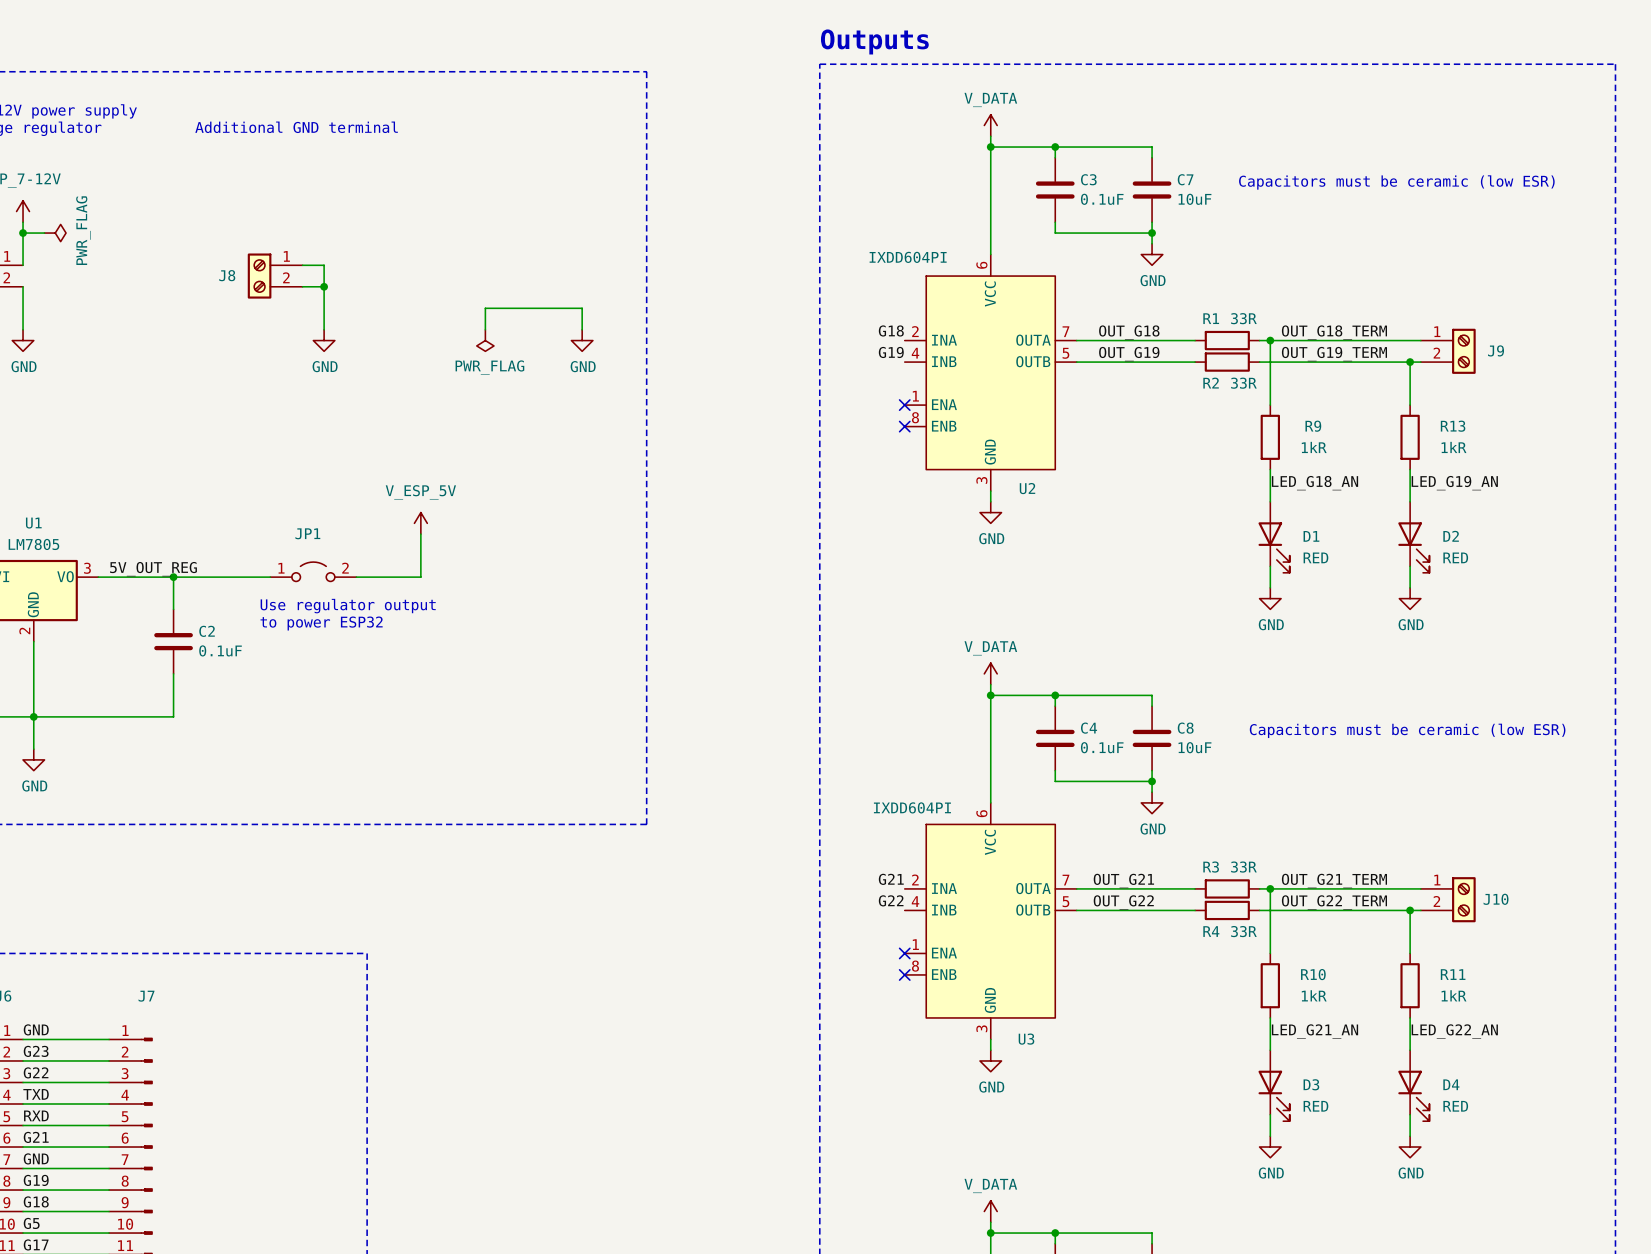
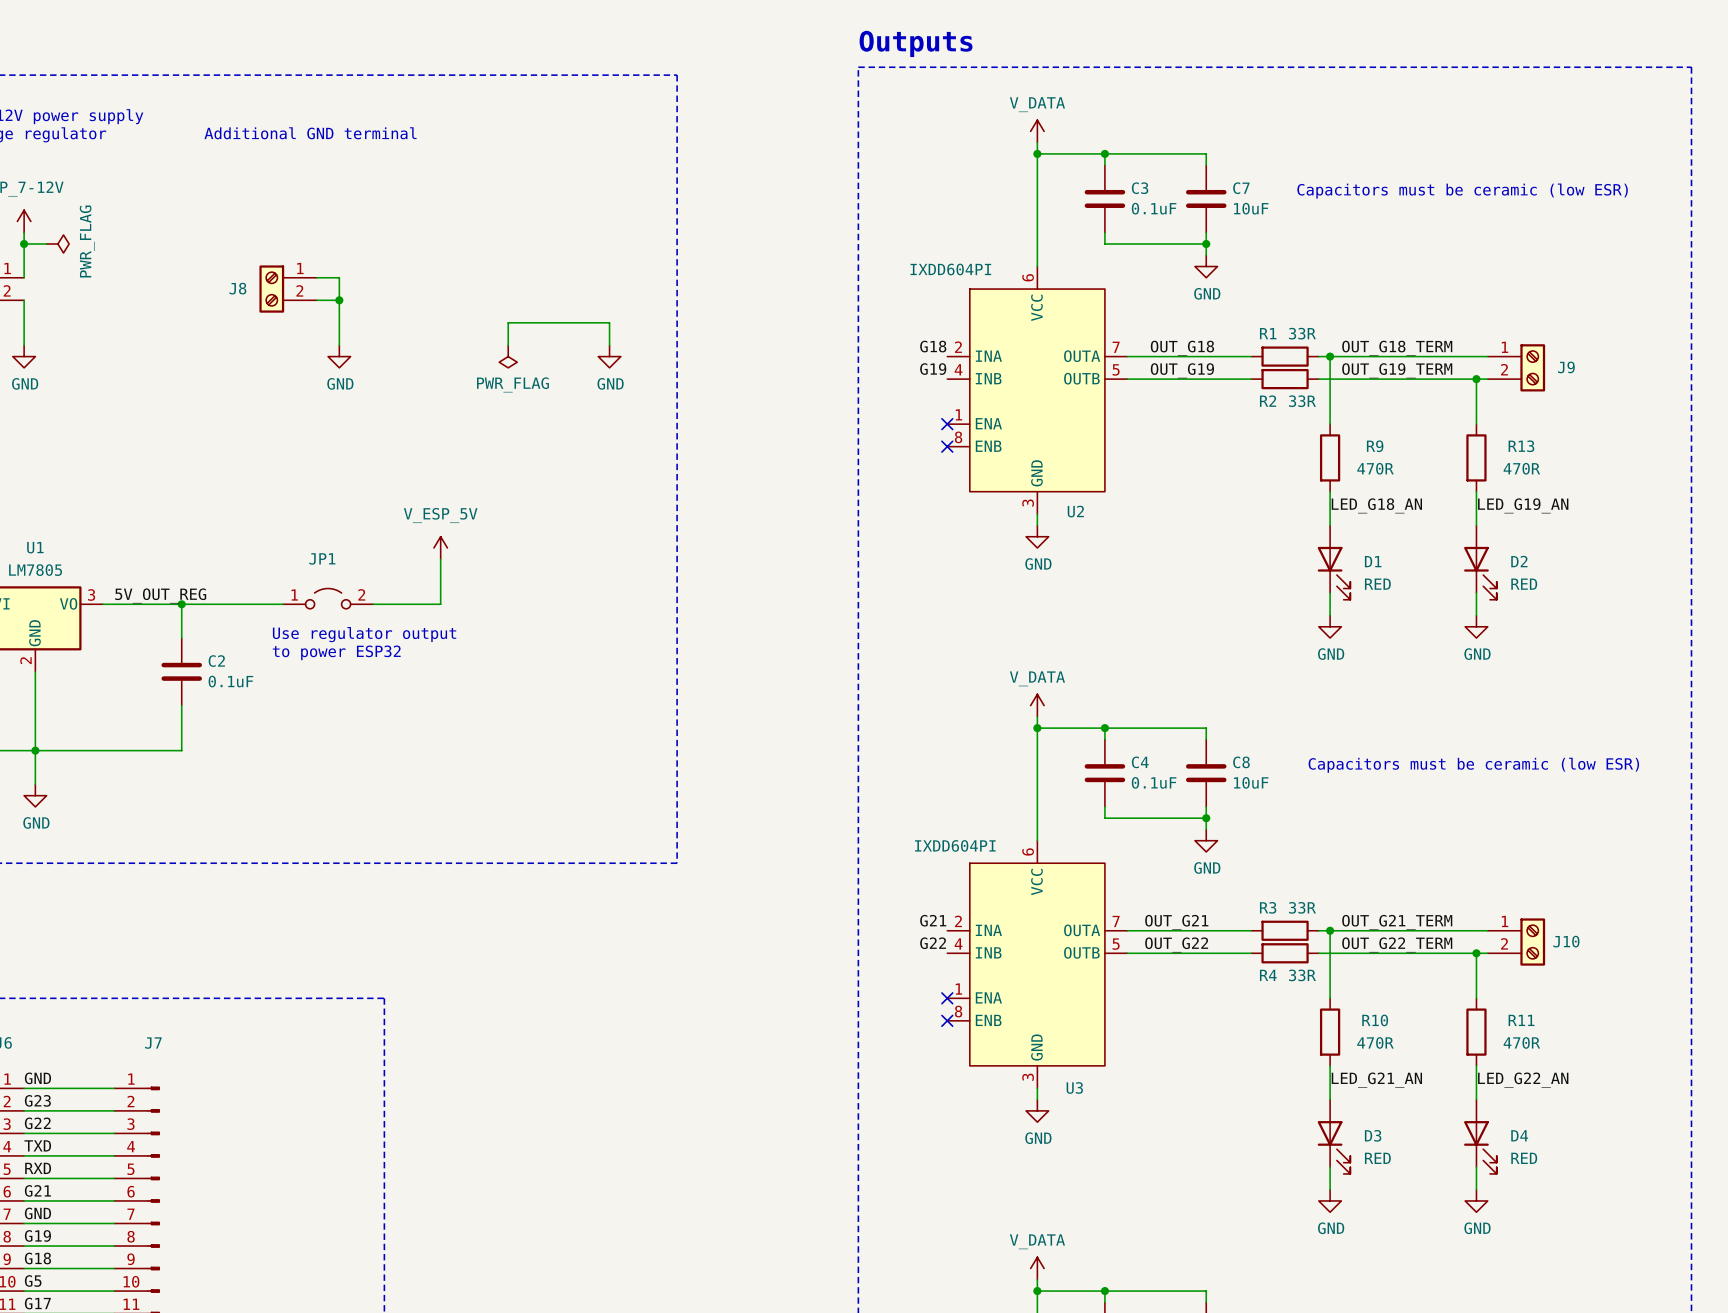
R9 value: 1kR (1314, 447) -> 470R (1375, 468)
R13 value: 1kR (1454, 447) -> 470R (1521, 468)
R10 value: 1kR (1314, 995) -> 470R (1375, 1042)
R11 value: 1kR (1454, 995) -> 470R (1521, 1042)

